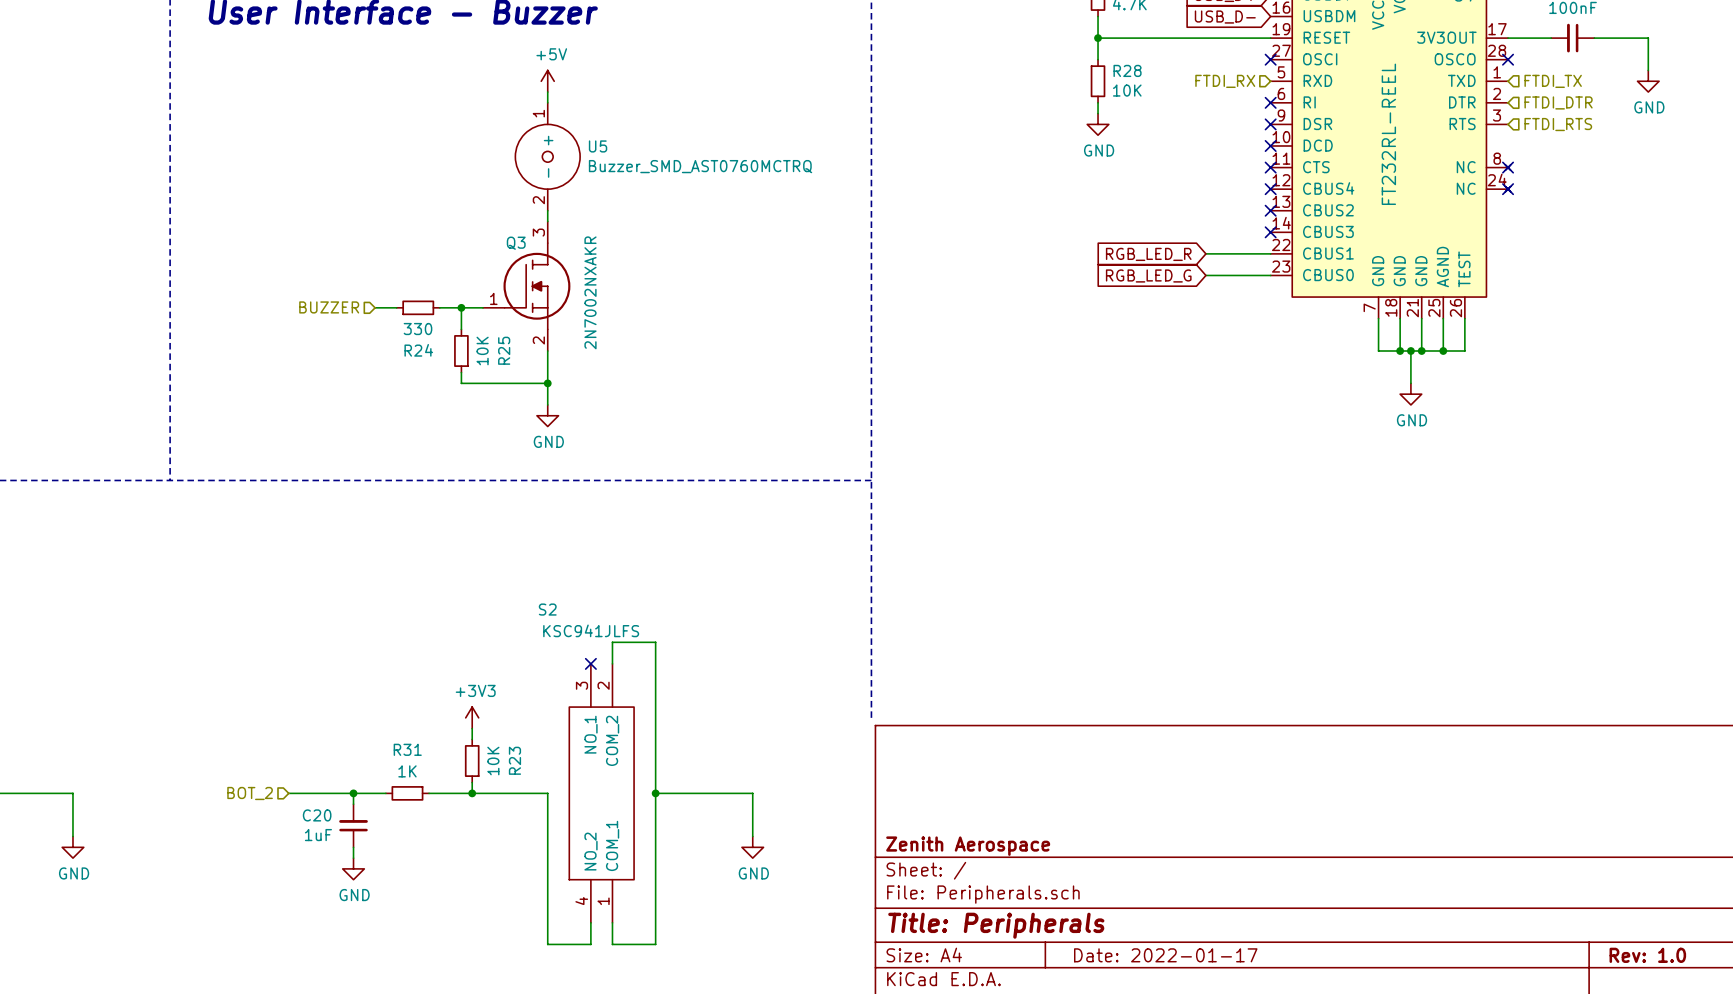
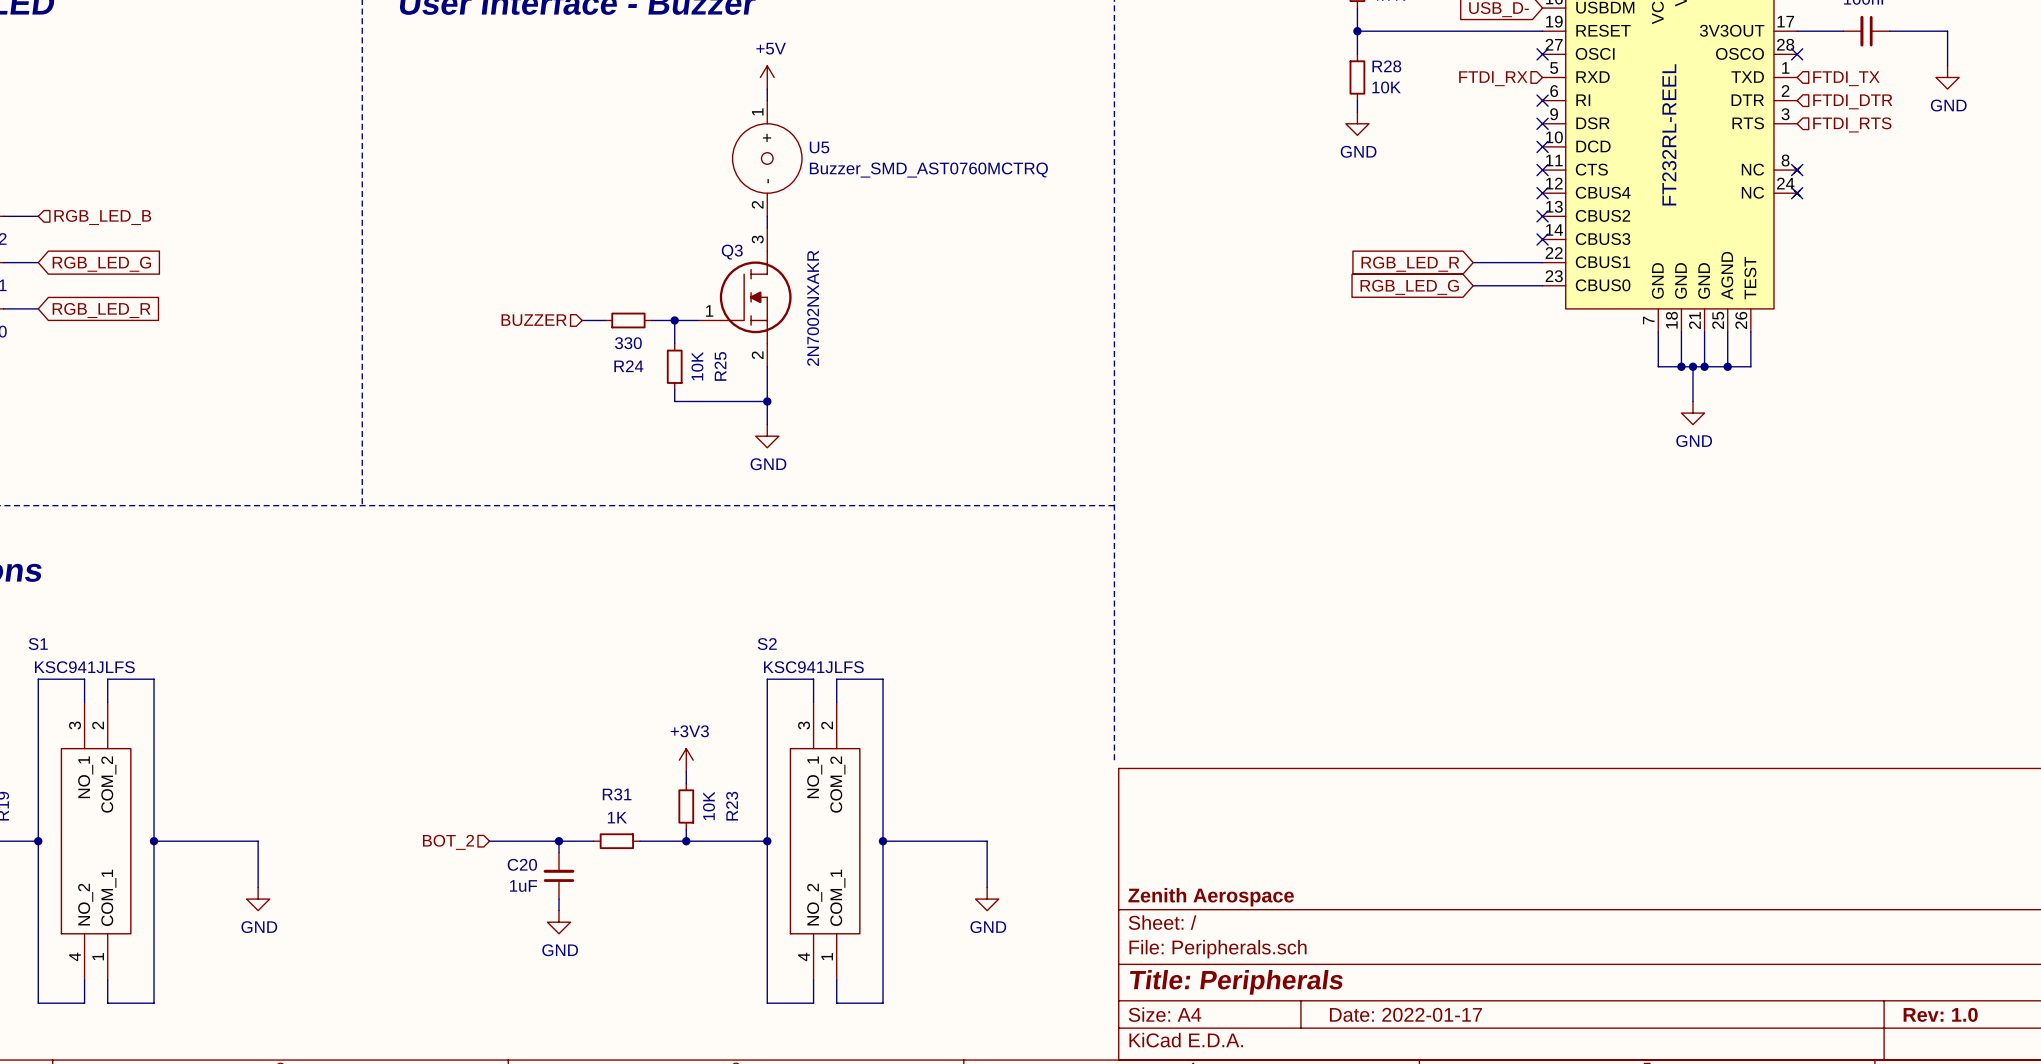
wire: none -> (813, 702) (813, 679) (767, 679) (767, 841)
no-connect mark: (590, 663) -> none
junction: none -> (767, 841)

